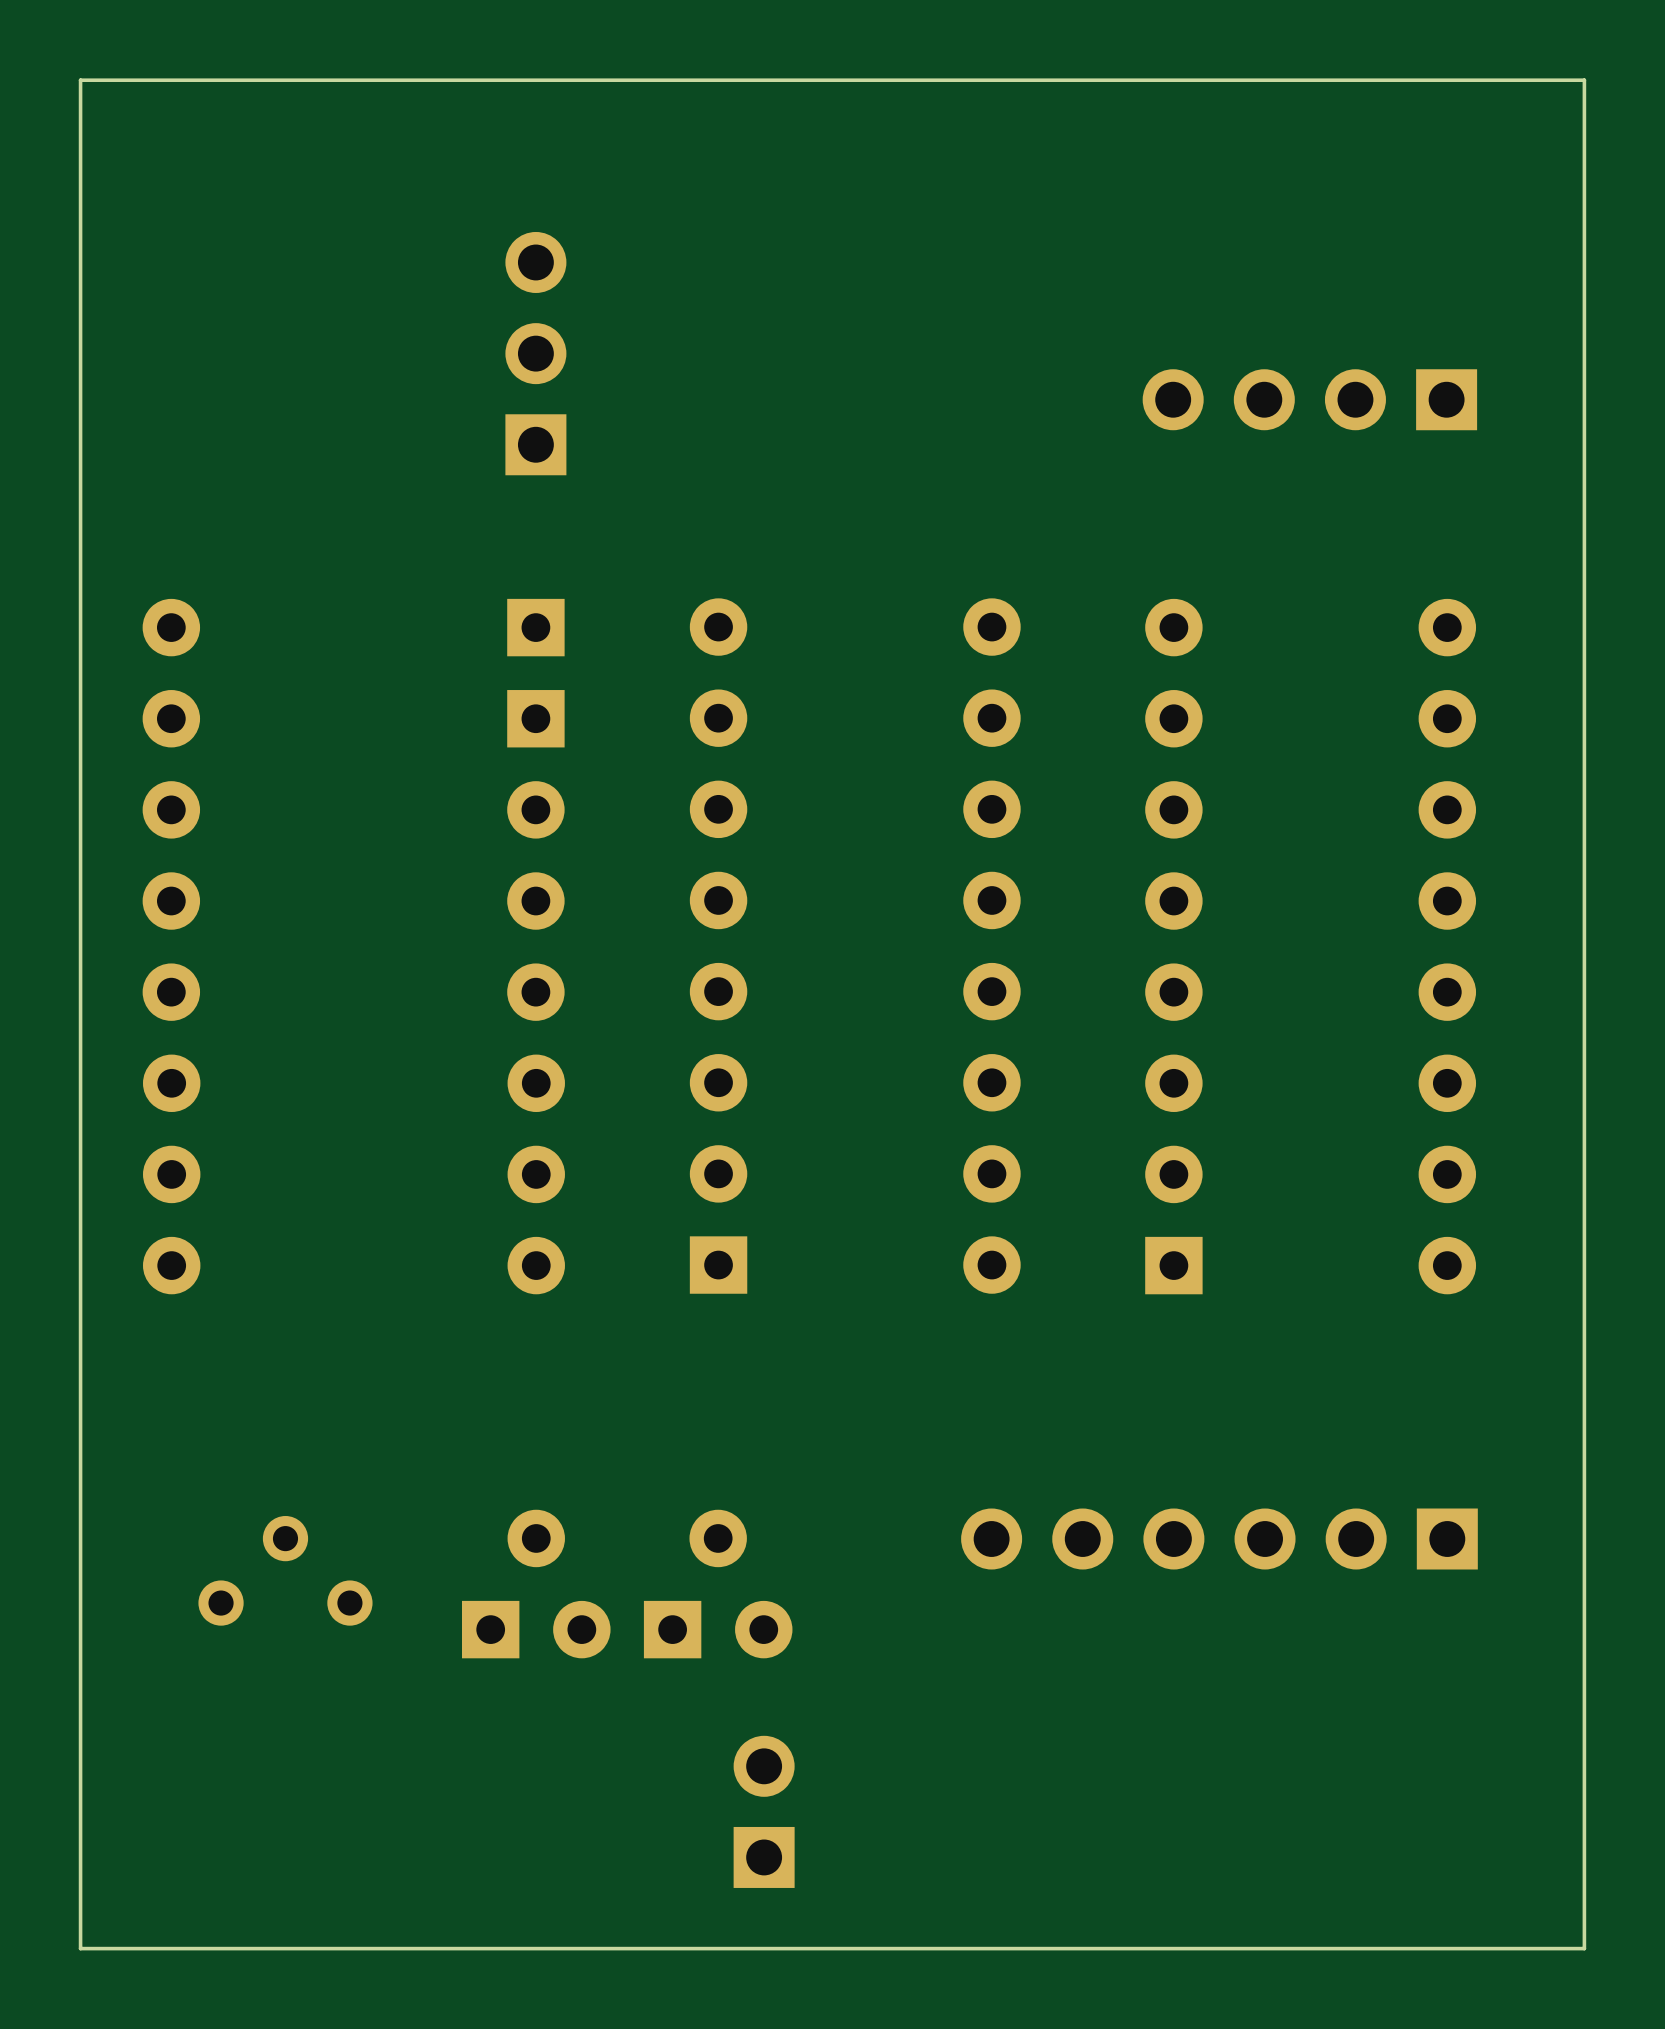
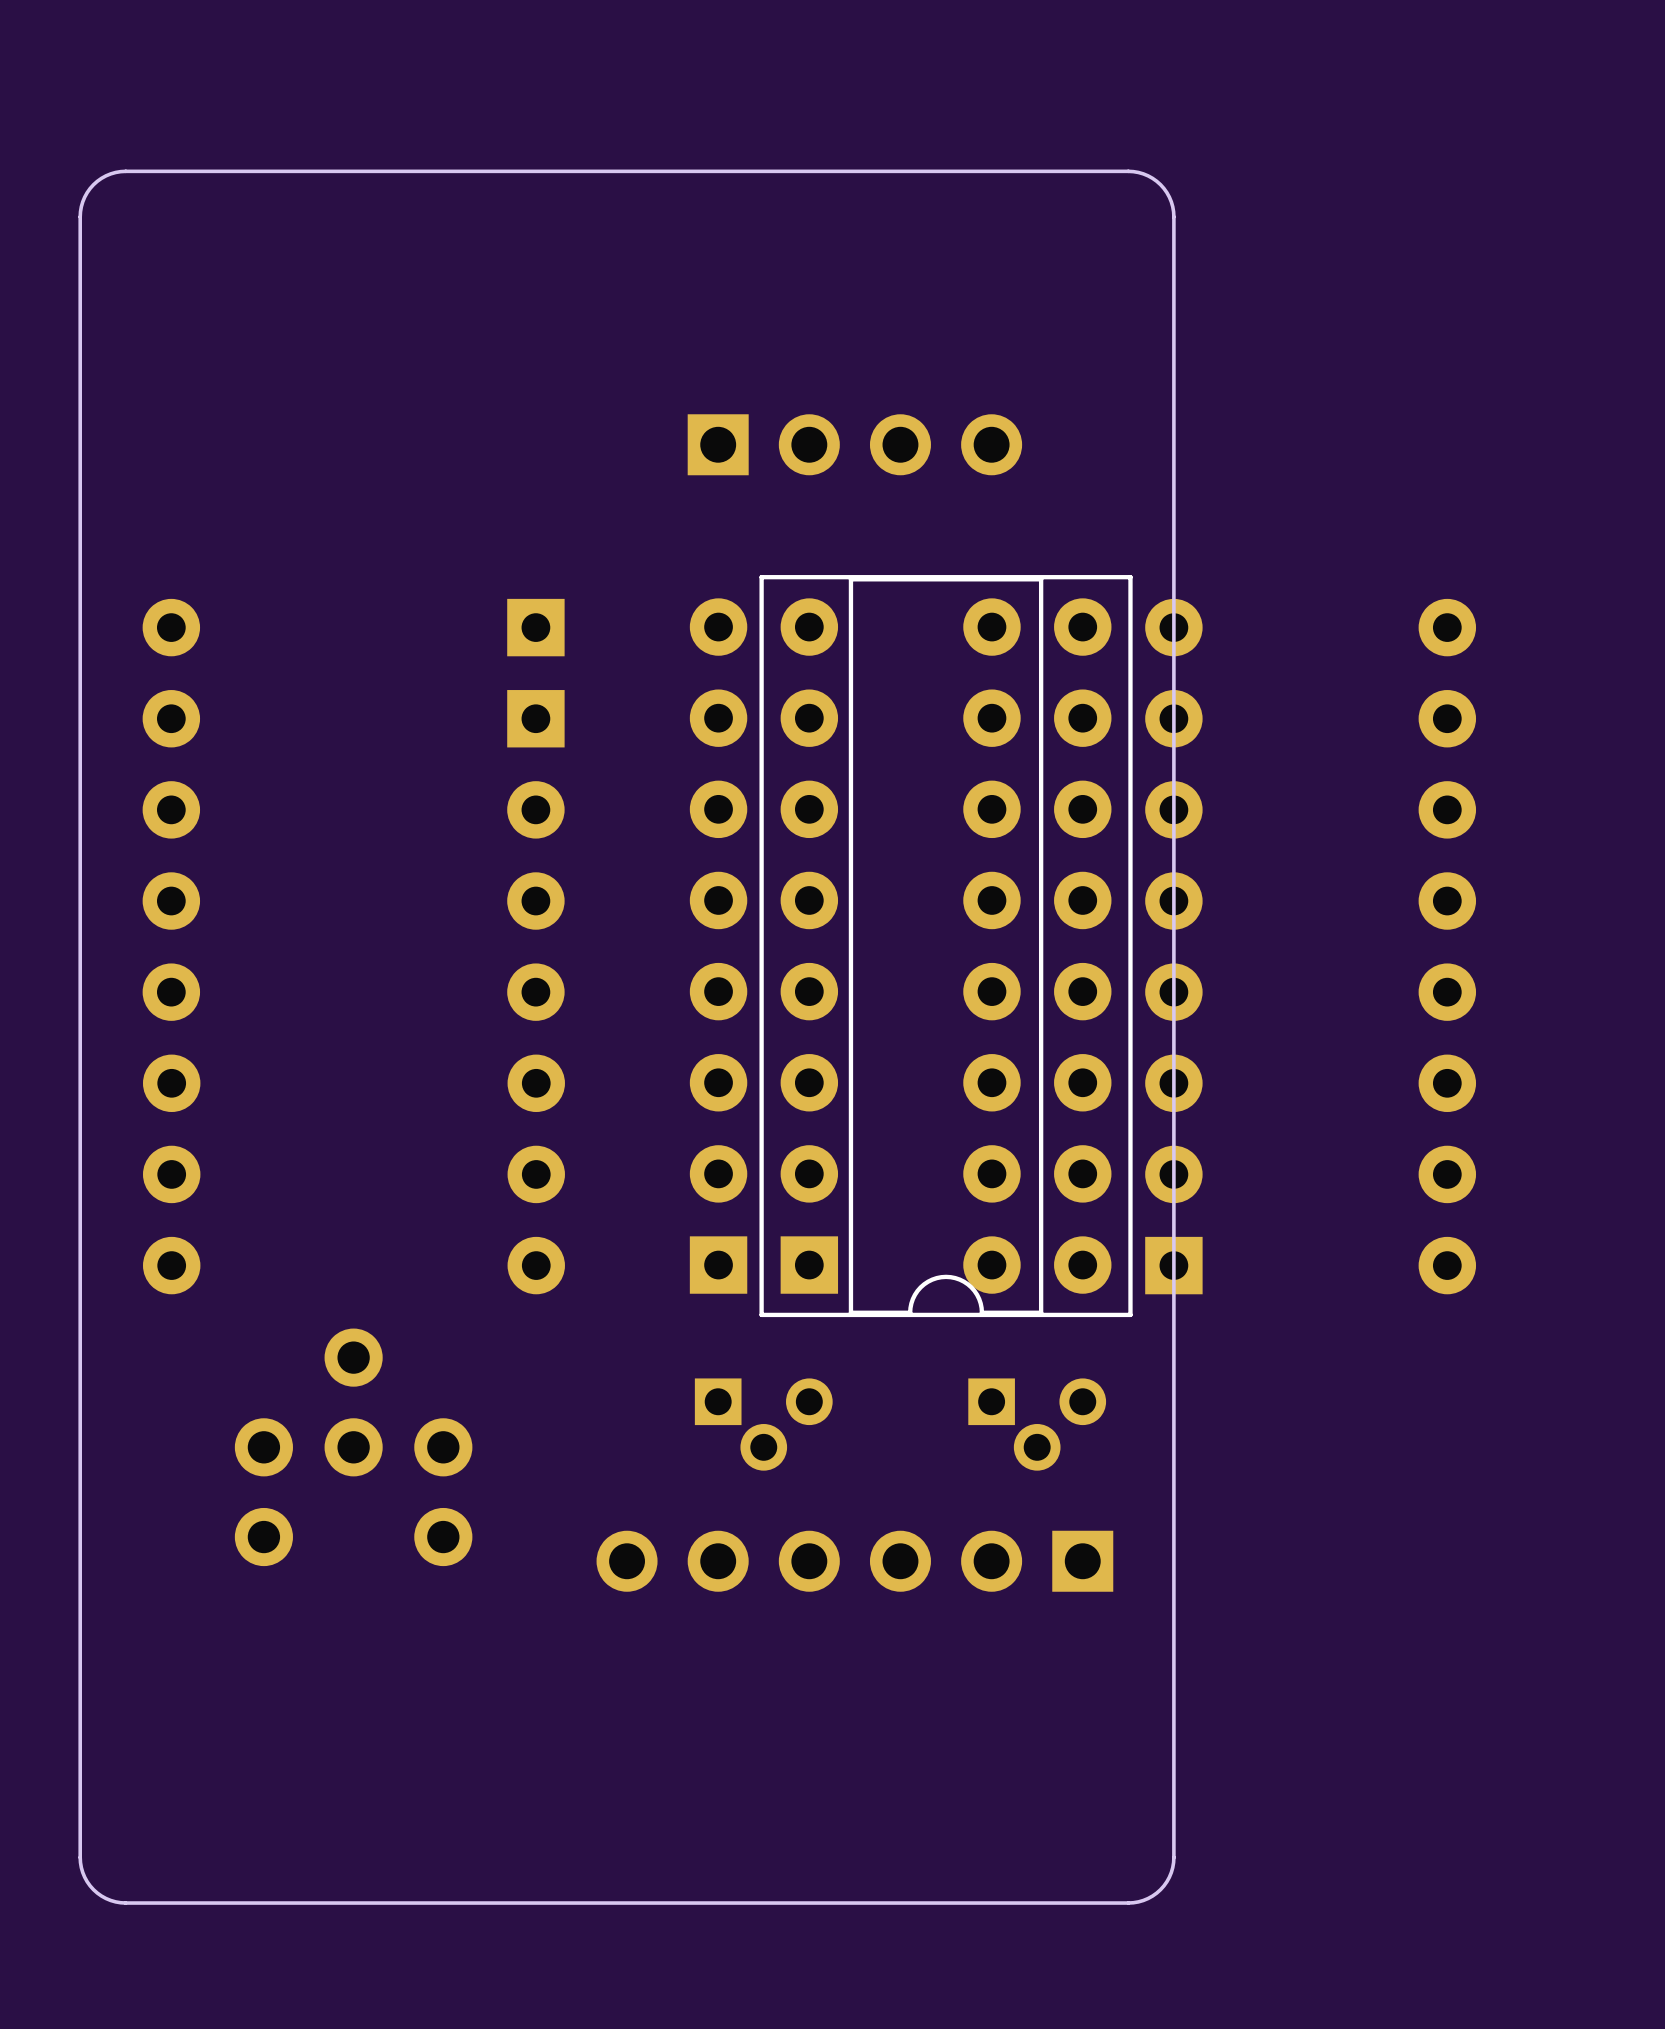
board edge: (1584, 80) (80, 80) (80, 1948) (1584, 1948) (1584, 80) -> (1128, 171) (1143, 173) (1160, 184) (1171, 201) (1173, 216) (1173, 1857) (1171, 1872) (1166, 1881) (1152, 1896) (1143, 1900) (1128, 1903) (125, 1903) (115, 1901) (101, 1896) (87, 1881) (81, 1867) (80, 1857) (80, 216) (82, 201) (87, 192) (97, 181) (106, 175) (125, 171) (1128, 171)
part: (535, 353) -> none
part rotation: 0° (1309, 399) -> 180° (854, 444)
part position: (1309, 399) -> (854, 444)
part: none -> (946, 946)
part: none -> (763, 1424)
part: none -> (1037, 1424)
part: none -> (353, 1447)
part position: (1219, 1539) -> (854, 1561)
part: (285, 1570) -> none
part: (536, 1584) -> none
part: (718, 1584) -> none
part: (764, 1811) -> none

